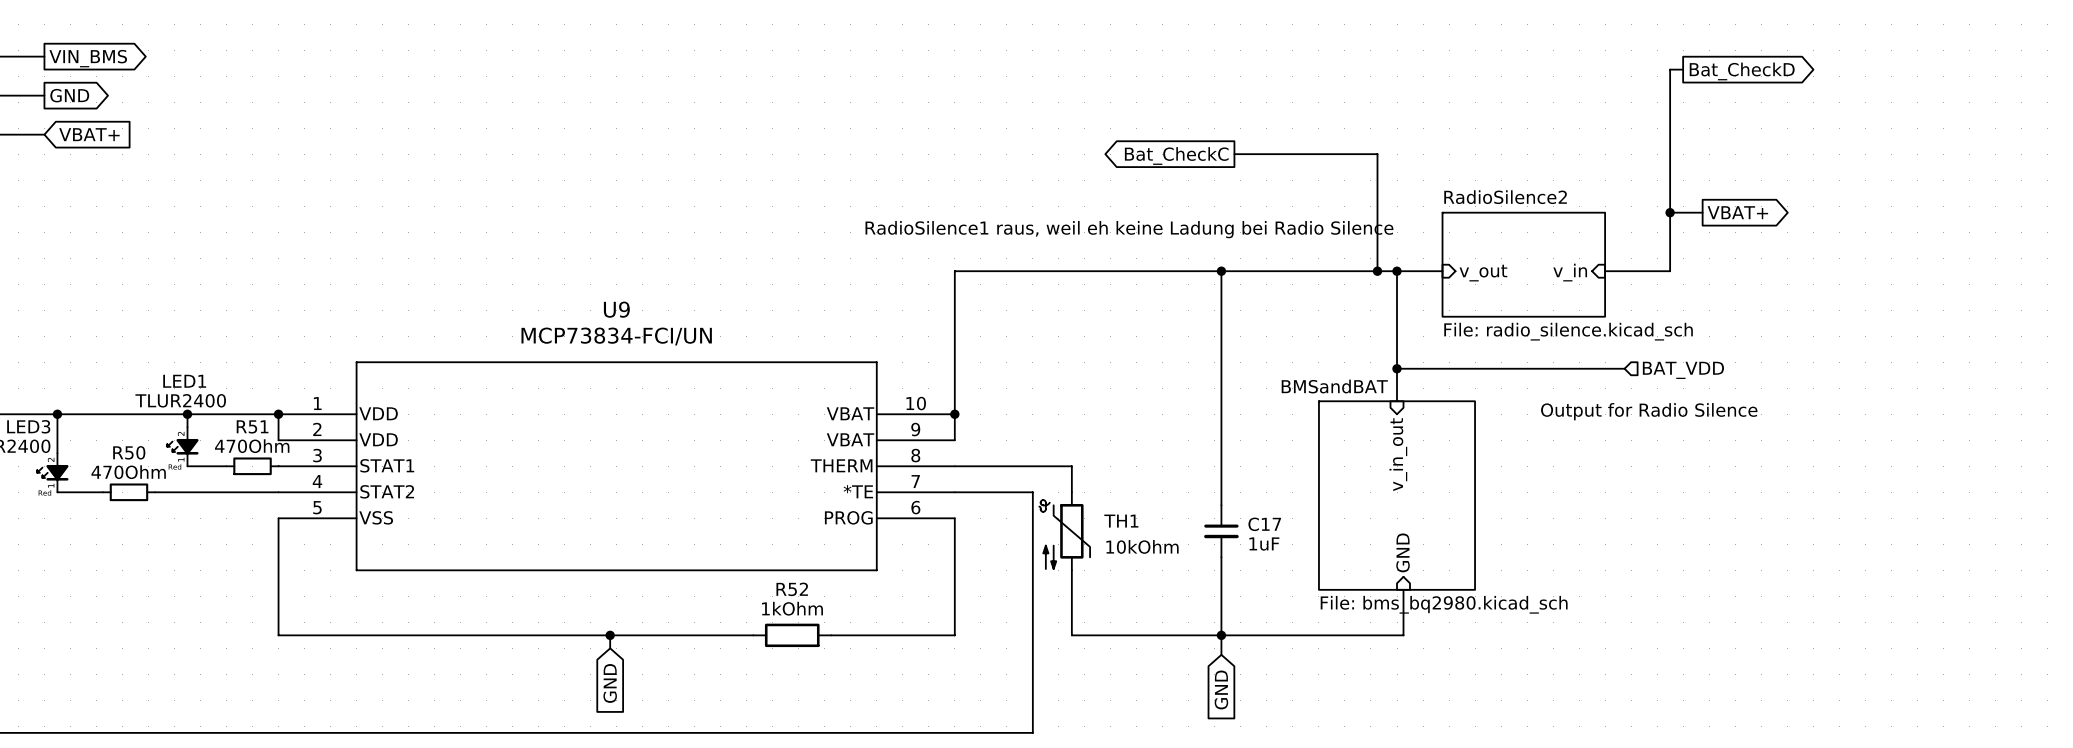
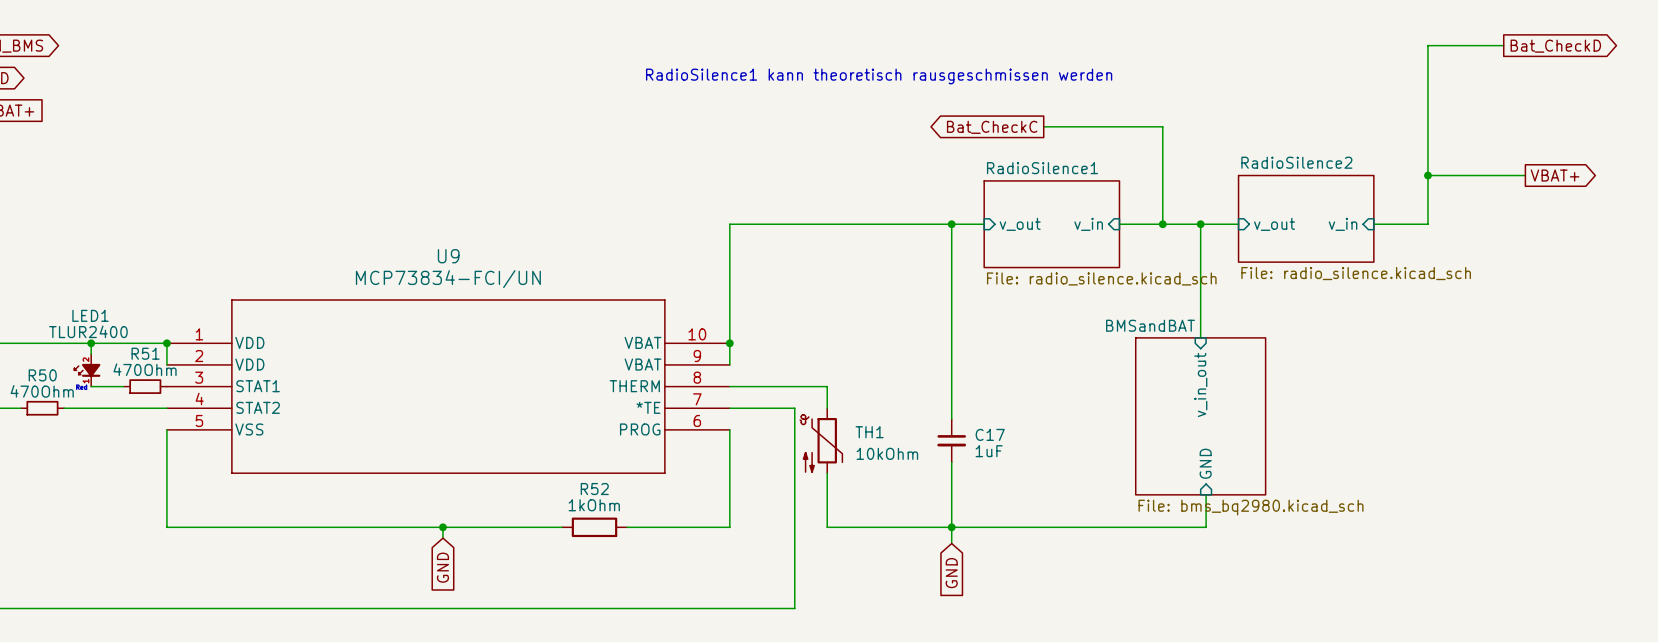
wire: none -> (1503, 45) (1427, 45) (1427, 224) (1373, 224)
wire: (1683, 69) (1670, 69) (1670, 271) (1605, 271) -> none
global label position: Bat_CheckD (1742, 71) -> Bat_CheckD (1555, 46)
text: none -> RadioSilence1 kann theoretisch rausgeschmissen werden (879, 76)
wire: (1234, 154) (1331, 154) -> none
wire: (1377, 154) (1377, 271) -> (1081, 126) (1162, 126) (1162, 224)
global label position: Bat_CheckC (1176, 155) -> Bat_CheckC (992, 127)
junction: (1670, 212) -> none
global label position: VBAT+ (1737, 212) -> VBAT+ (1555, 175)
wire: none -> (1427, 175) (1525, 175)
junction: none -> (1427, 175)
text: RadioSilence1 raus, weil eh keine Ladung bei Radio Silence (1129, 229) -> none
sheet RadioSilence2 position: (1523, 264) -> (1306, 218)
wire: (1260, 271) (1423, 271) -> none
sheet RadioSilence1: none -> File: radio_silence.kicad_sch (1051, 224)
junction: (1377, 271) -> none
wire: (1397, 271) (1397, 401) -> none
junction: (1397, 271) -> none
wire: none -> (1135, 224) (1238, 224)
junction: none -> (1162, 224)
wire: none -> (1200, 224) (1200, 337)
junction: none -> (1200, 224)
sheet pin: none -> v_in (1088, 224)
sheet pin: v_in (1570, 272) -> v_out (1274, 224)
sheet pin: none -> v_in (1343, 224)
sheet pin: none -> v_out (1020, 224)
sheet pin: v_out (1483, 273) -> none
wire: (1397, 368) (1624, 368) -> none
junction: (1397, 368) -> none
hierarchical label: BAT_VDD (1683, 370) -> none
text: Output for Radio Silence (1649, 411) -> none
sheet pin position: v_in_out (1398, 454) -> v_in_out (1200, 384)
sheet BMSandBAT position: (1397, 495) -> (1200, 416)
sheet pin position: GND (1403, 552) -> GND (1205, 463)
wire: (1403, 589) (1403, 635) -> (1206, 494) (1206, 527) (1103, 527)

